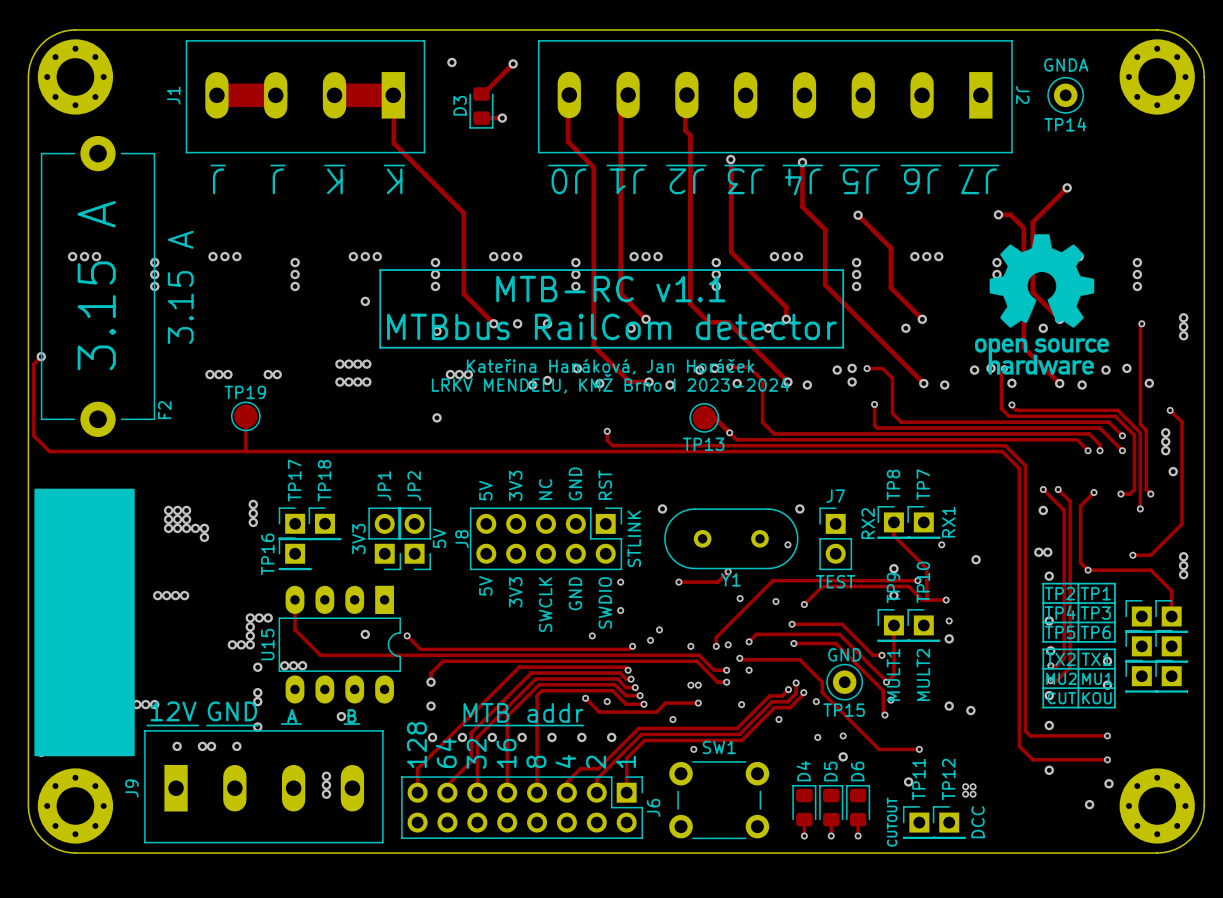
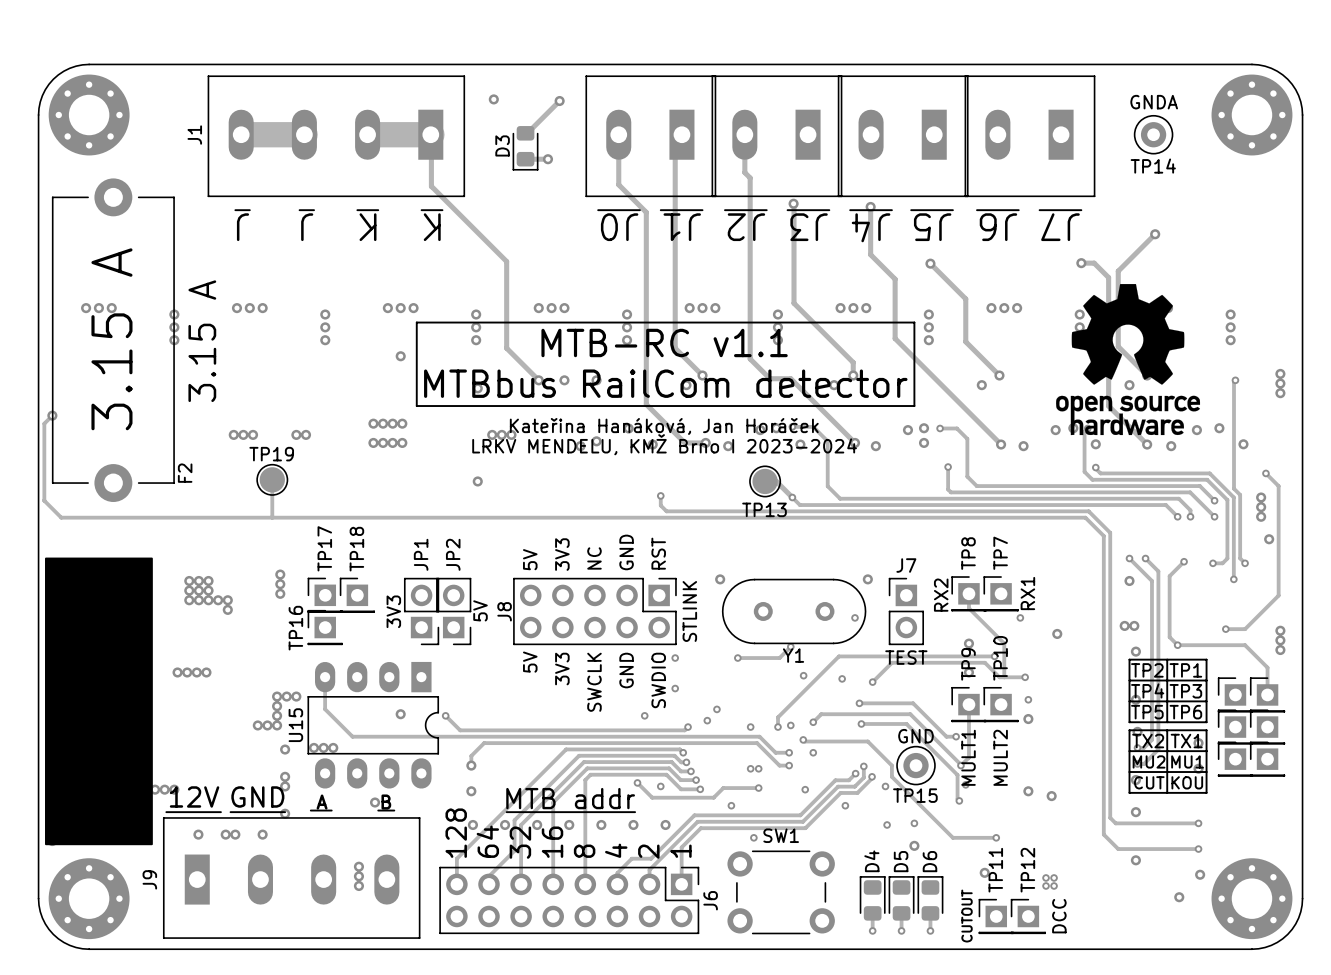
part: none -> (650, 136)
part: none -> (776, 136)
J2: (775, 96) -> none
part: none -> (903, 136)
part: none -> (1029, 136)

